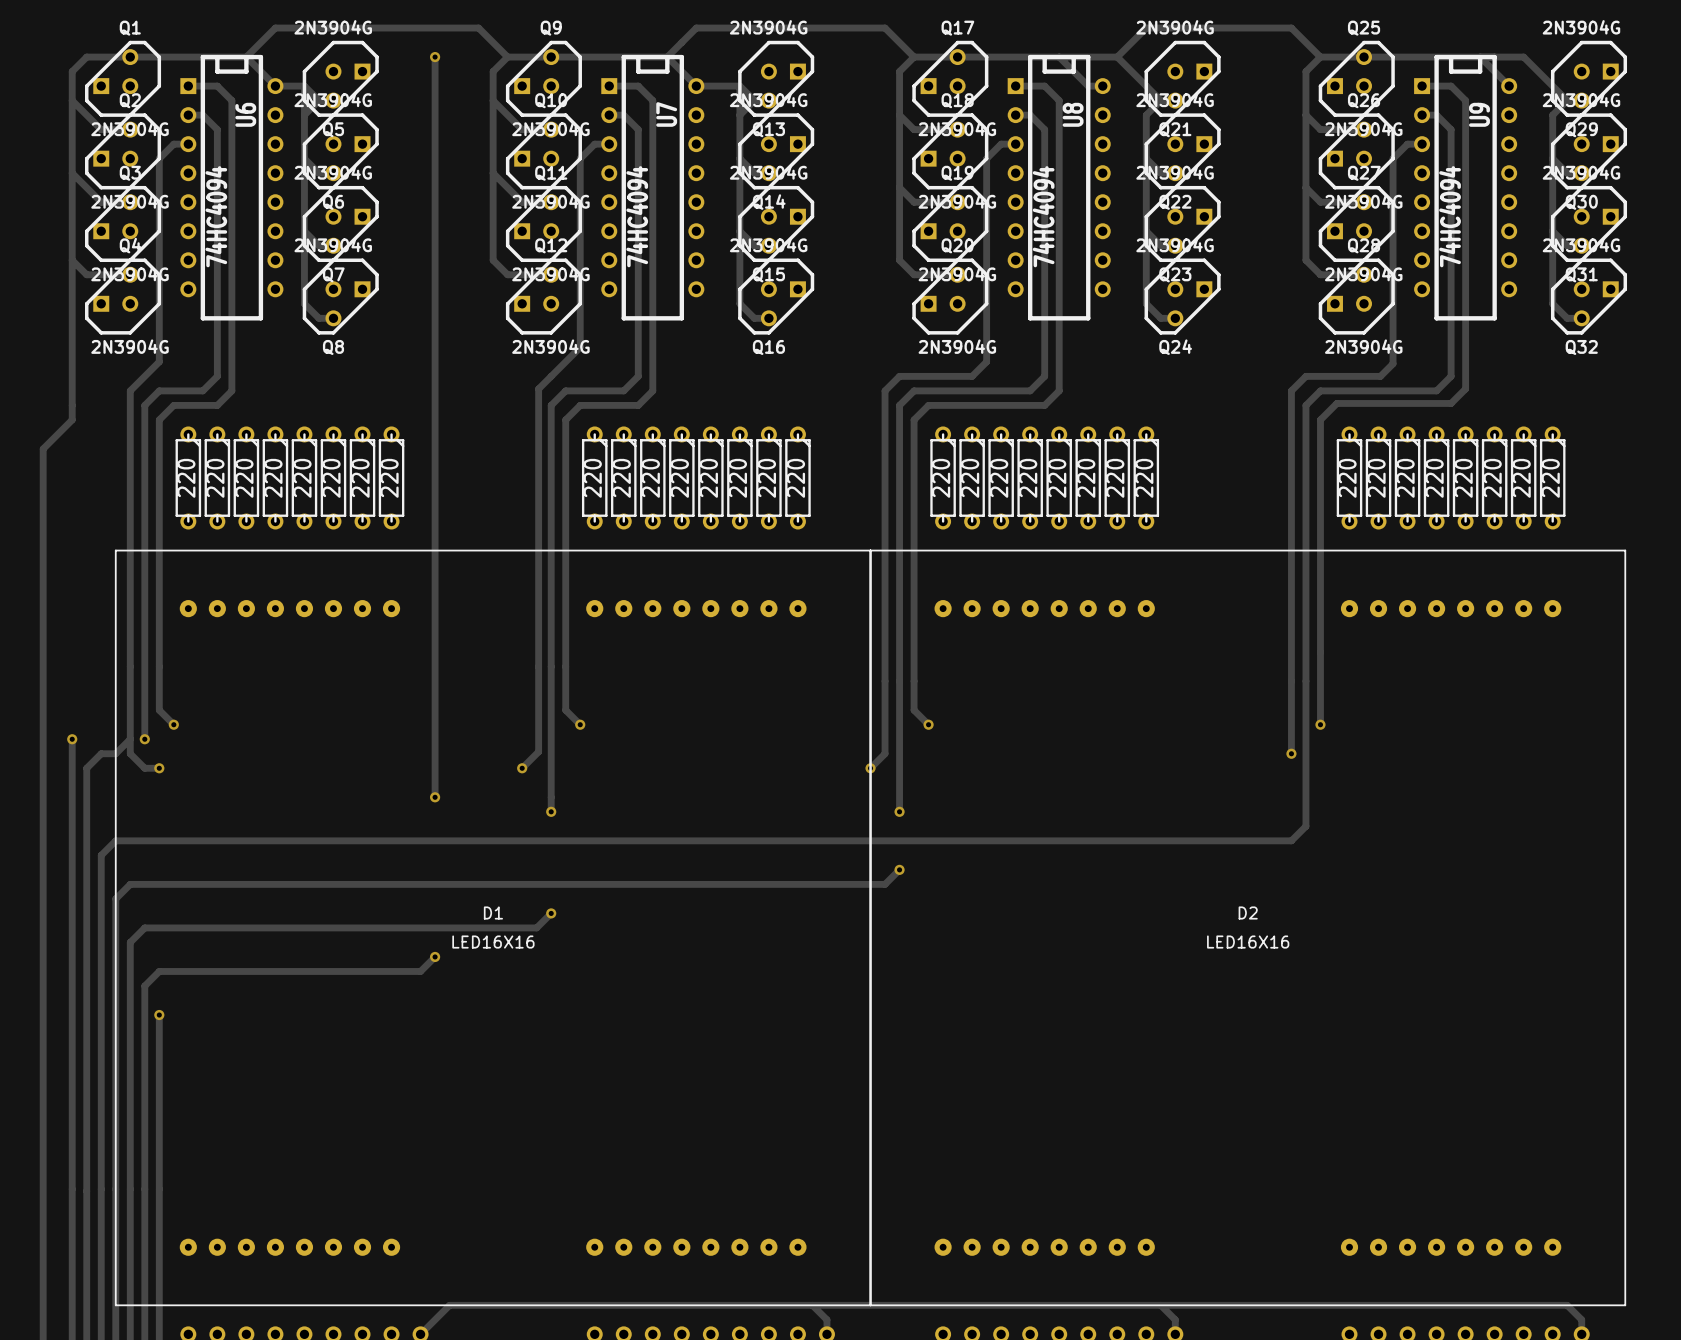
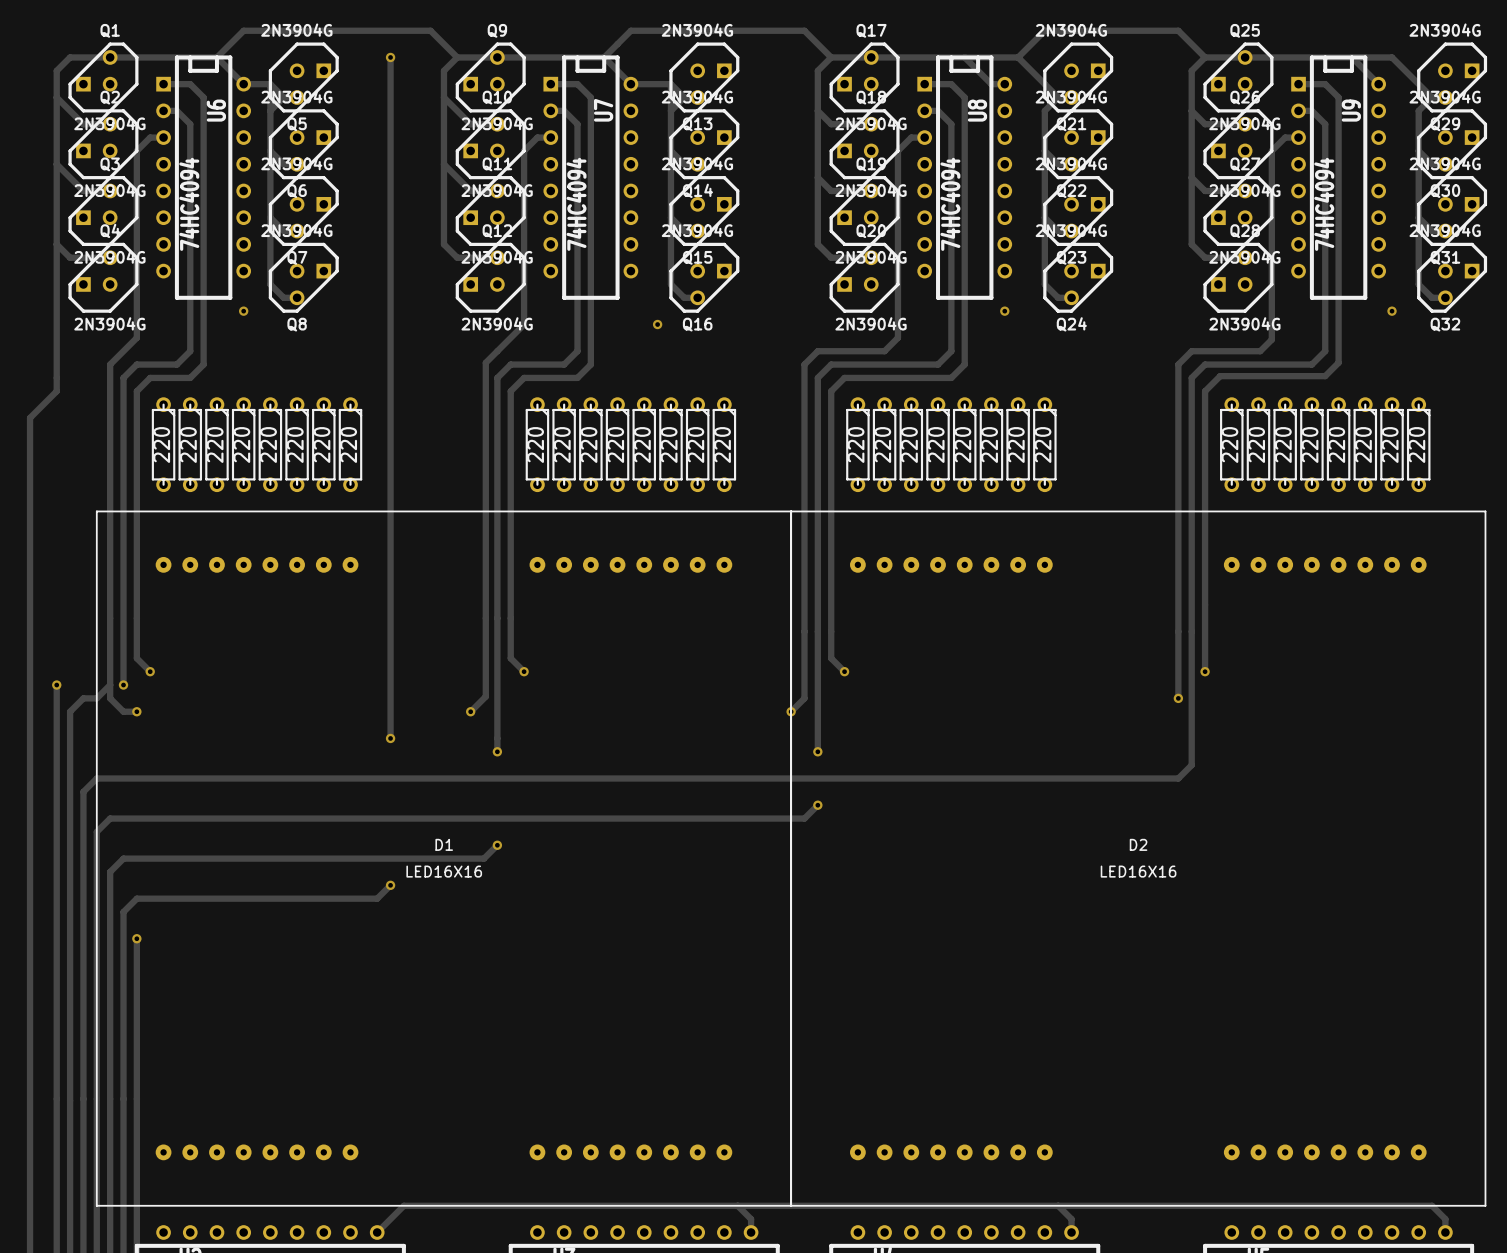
via: none -> (243, 311)
via: none -> (1004, 311)
via: none -> (1392, 311)
via: none -> (657, 324)

